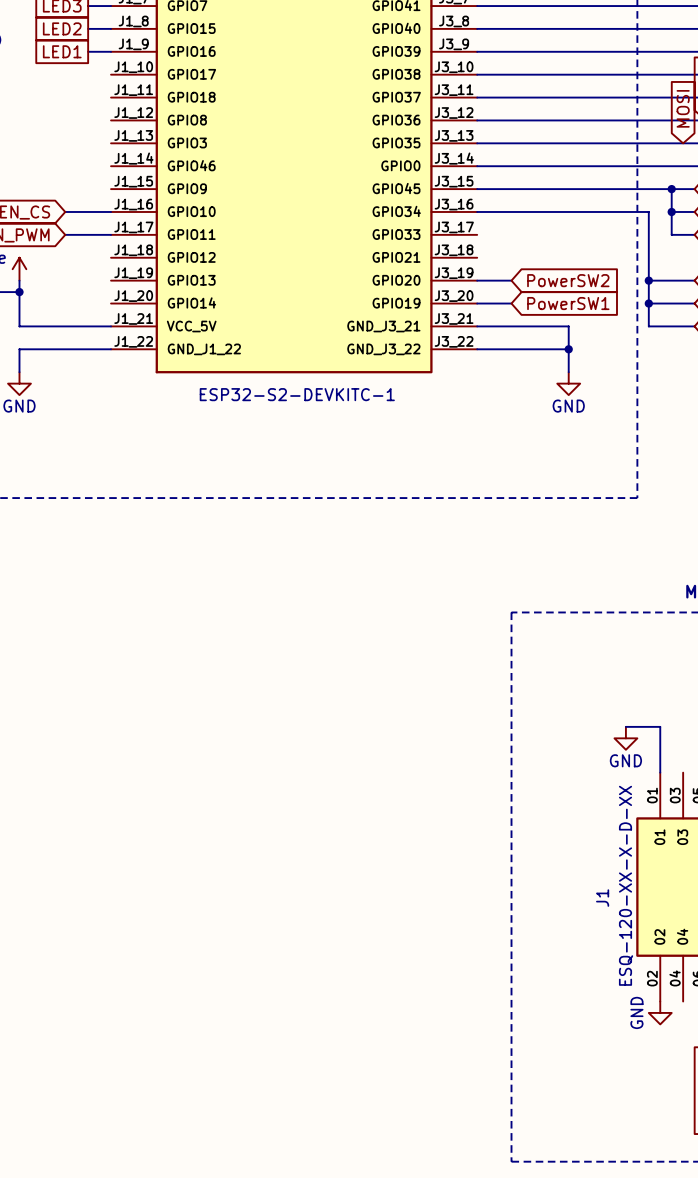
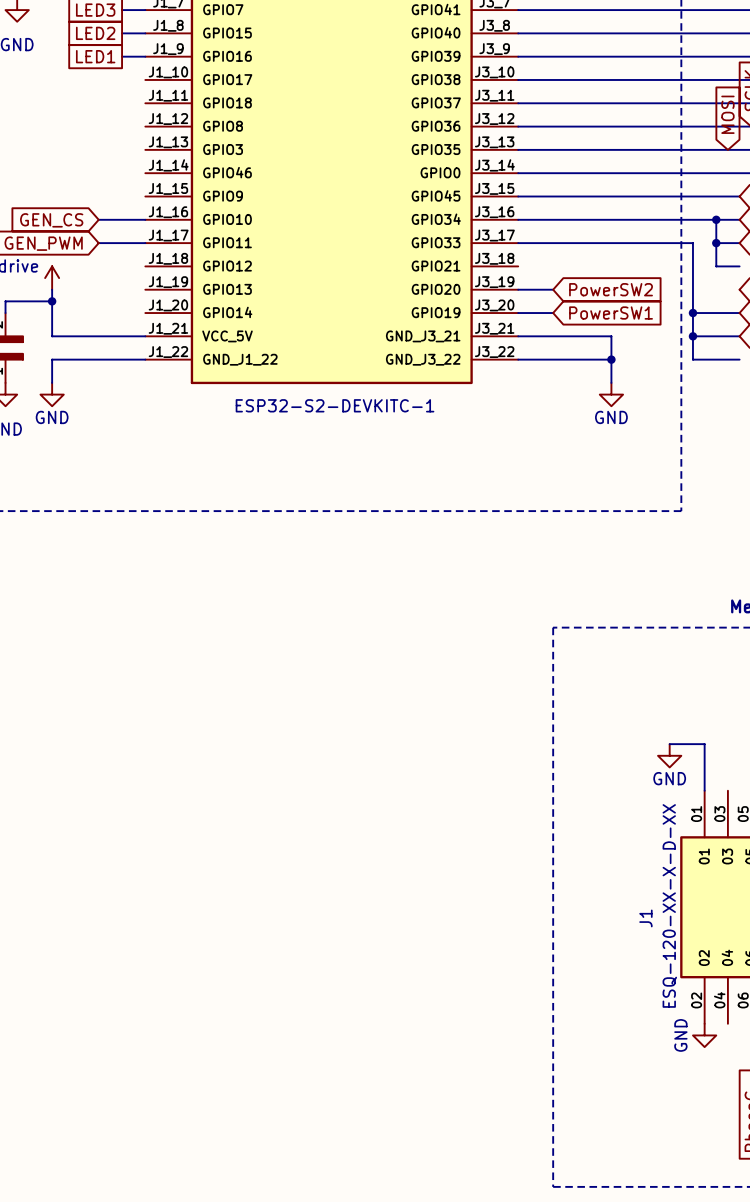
wire: (671, 189) (671, 211) -> (692, 219) (716, 219)
junction: (671, 189) -> none
wire: (648, 211) (648, 234) -> (518, 243) (692, 243)
wire: none -> (716, 243) (716, 266) (739, 266)
junction: none -> (716, 243)
wire: (648, 280) (694, 280) -> none
junction: (648, 280) -> none
wire: none -> (692, 336) (692, 359) (739, 359)
junction: none -> (692, 336)

